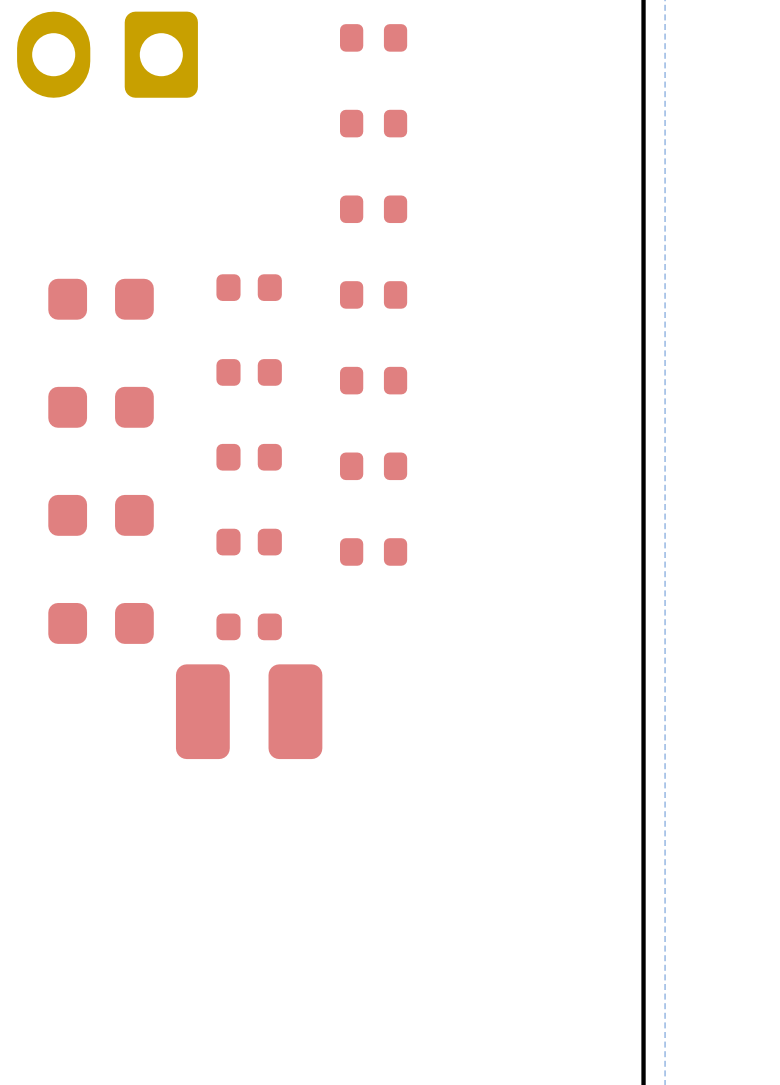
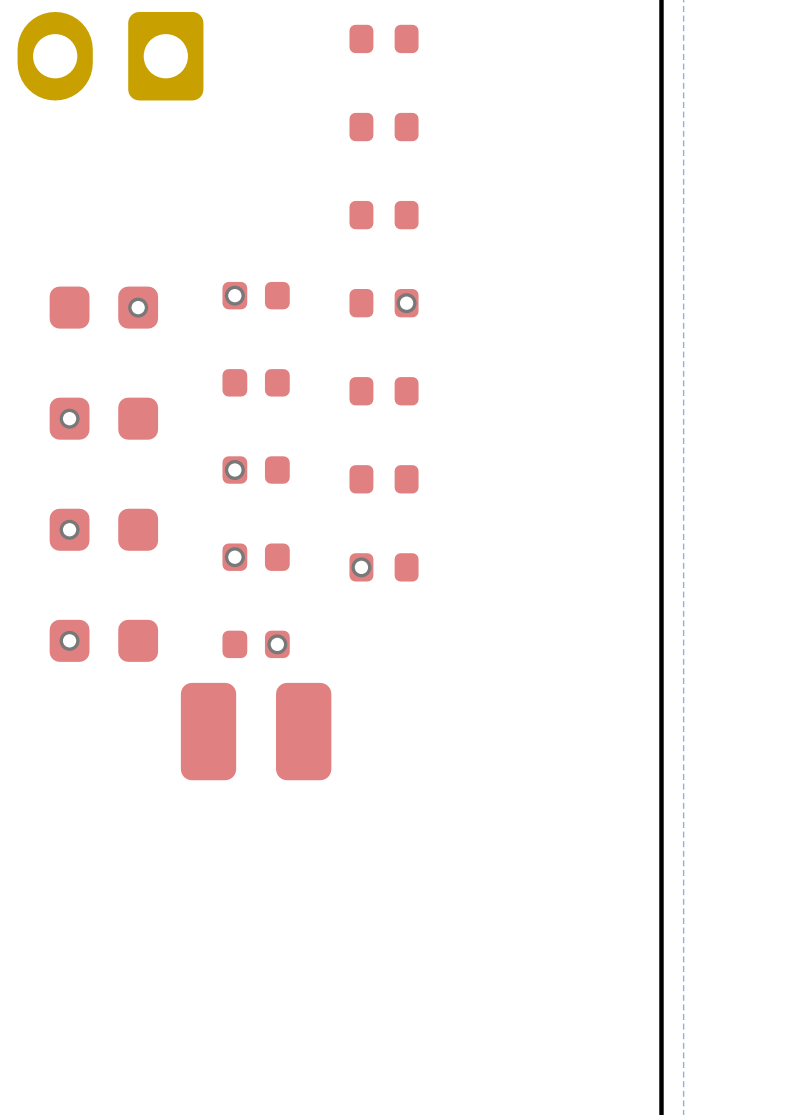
via: none -> (234, 295)
via: none -> (406, 303)
via: none -> (138, 307)
via: none -> (69, 418)
via: none -> (234, 470)
via: none -> (69, 529)
via: none -> (234, 557)
via: none -> (361, 567)
via: none -> (69, 640)
via: none -> (277, 644)

